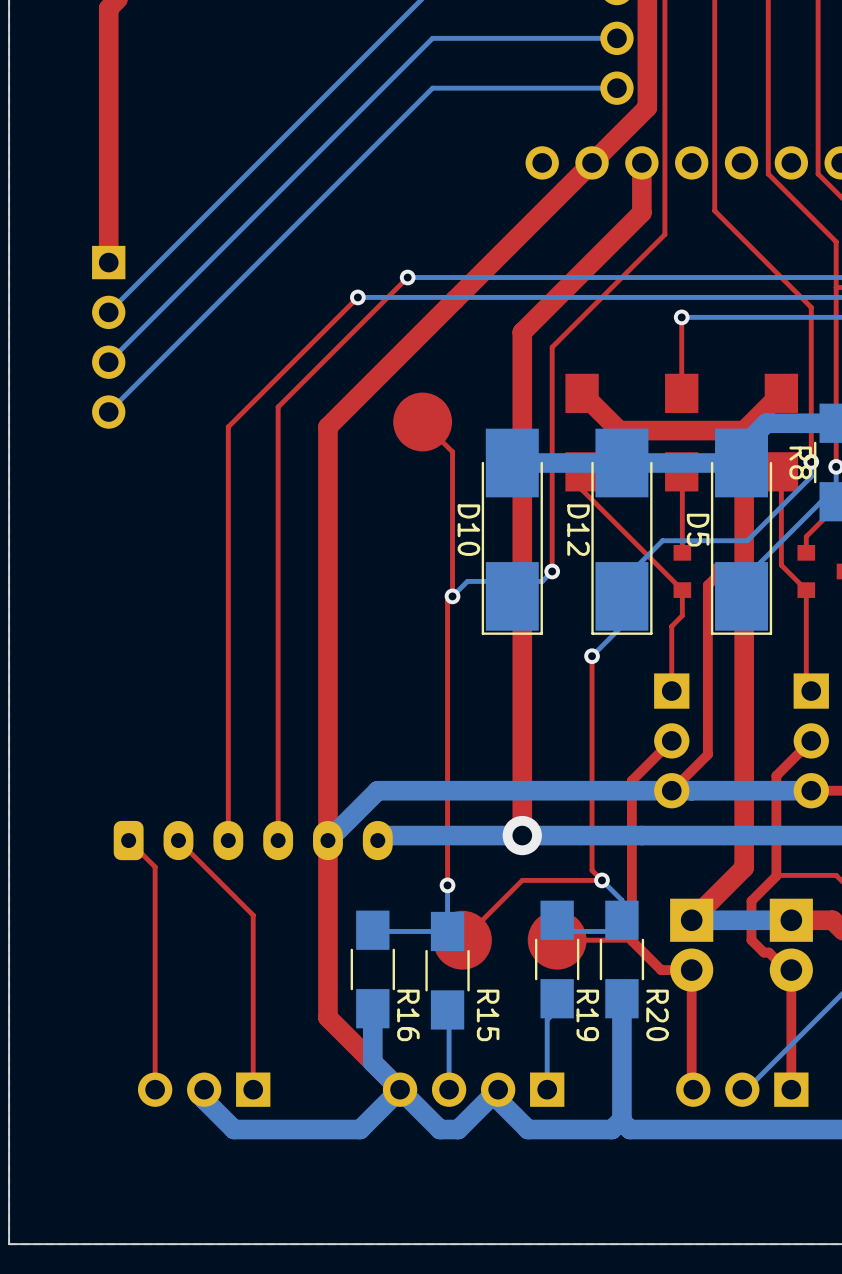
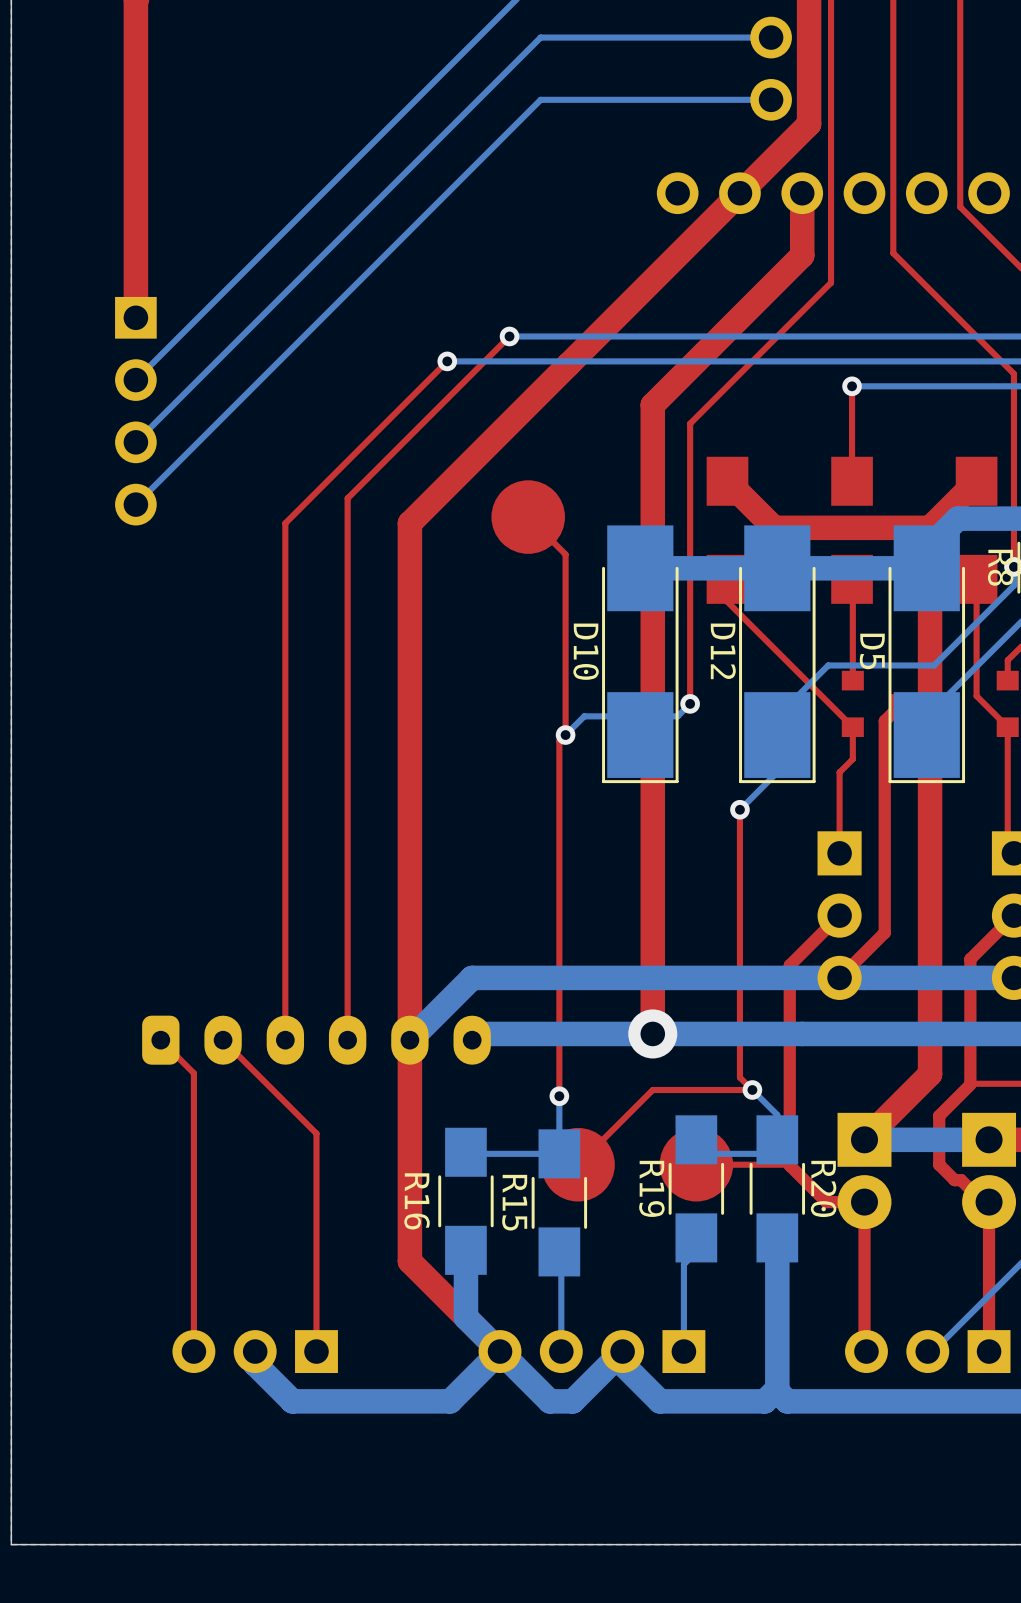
R16 name position: R16 (408, 1015) -> R16 (417, 1201)
R15 name position: R15 (488, 1015) -> R15 (514, 1202)
R19 name position: R19 (587, 1015) -> R19 (651, 1188)
R20 name position: R20 (657, 1015) -> R20 (823, 1188)

